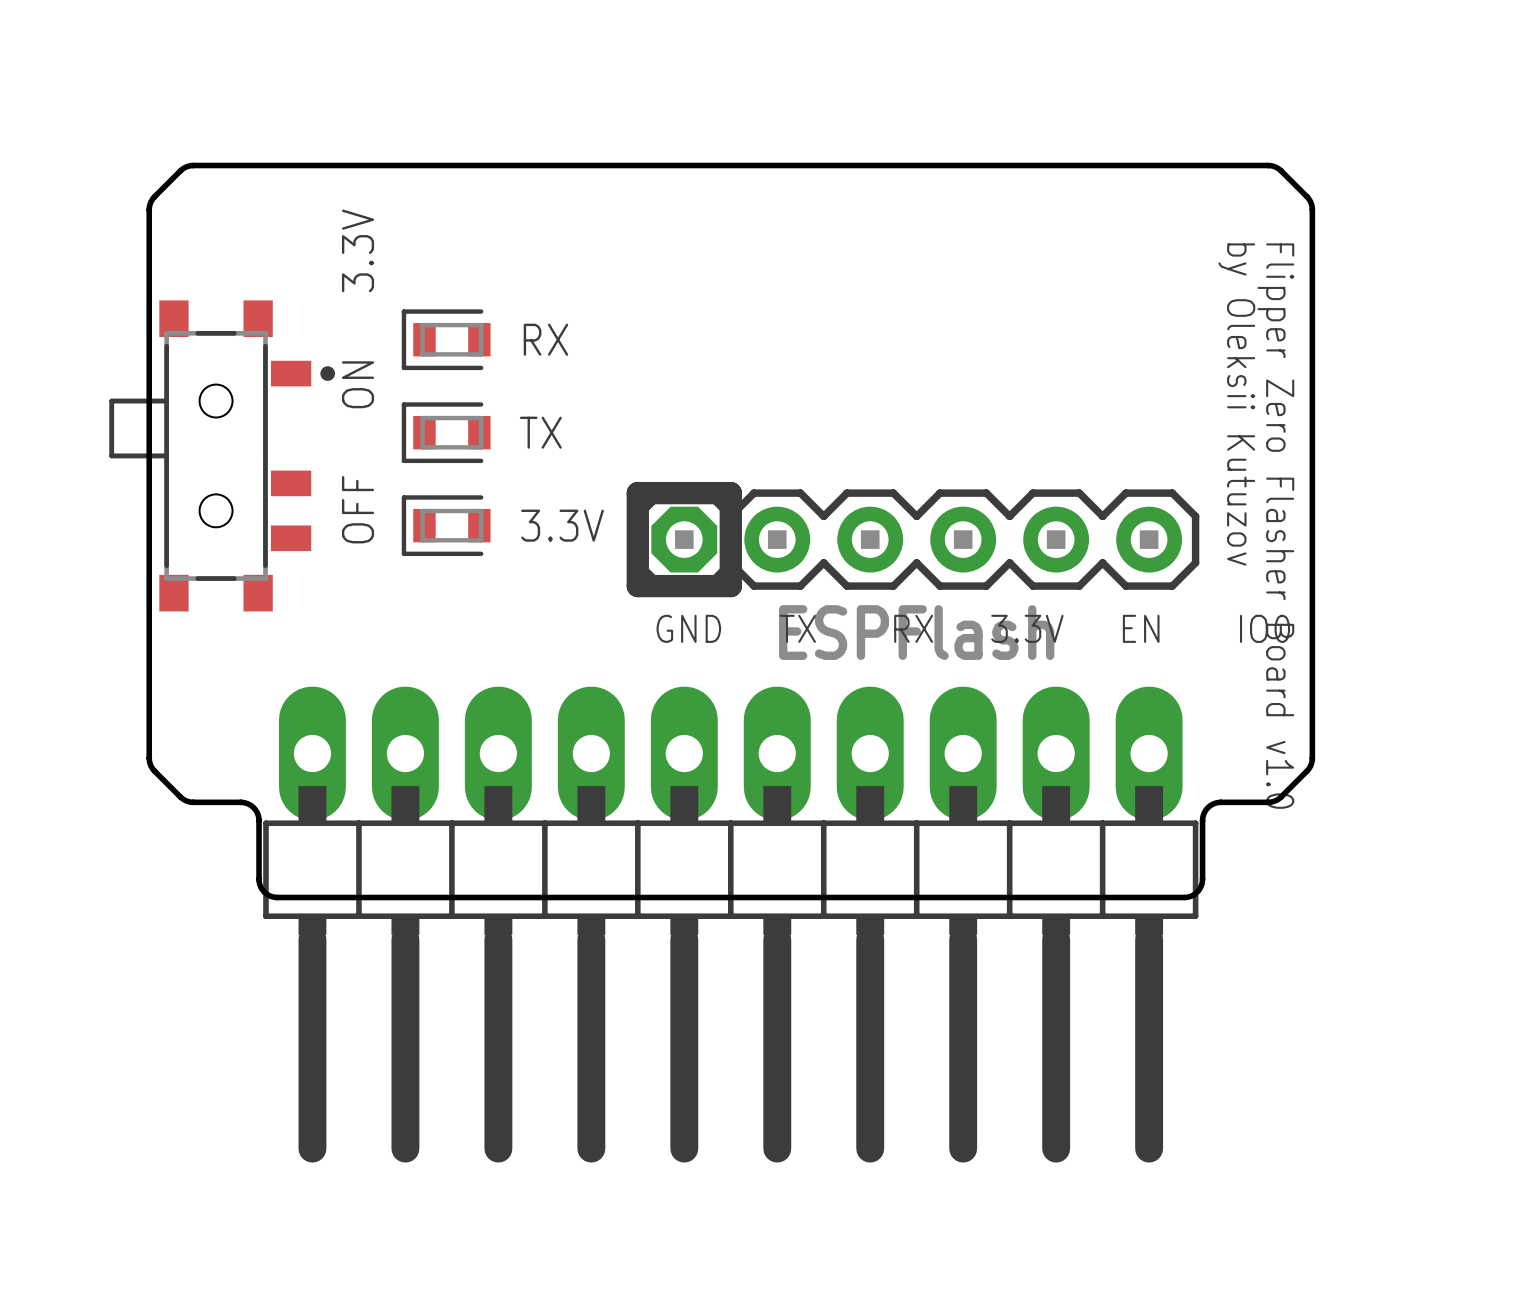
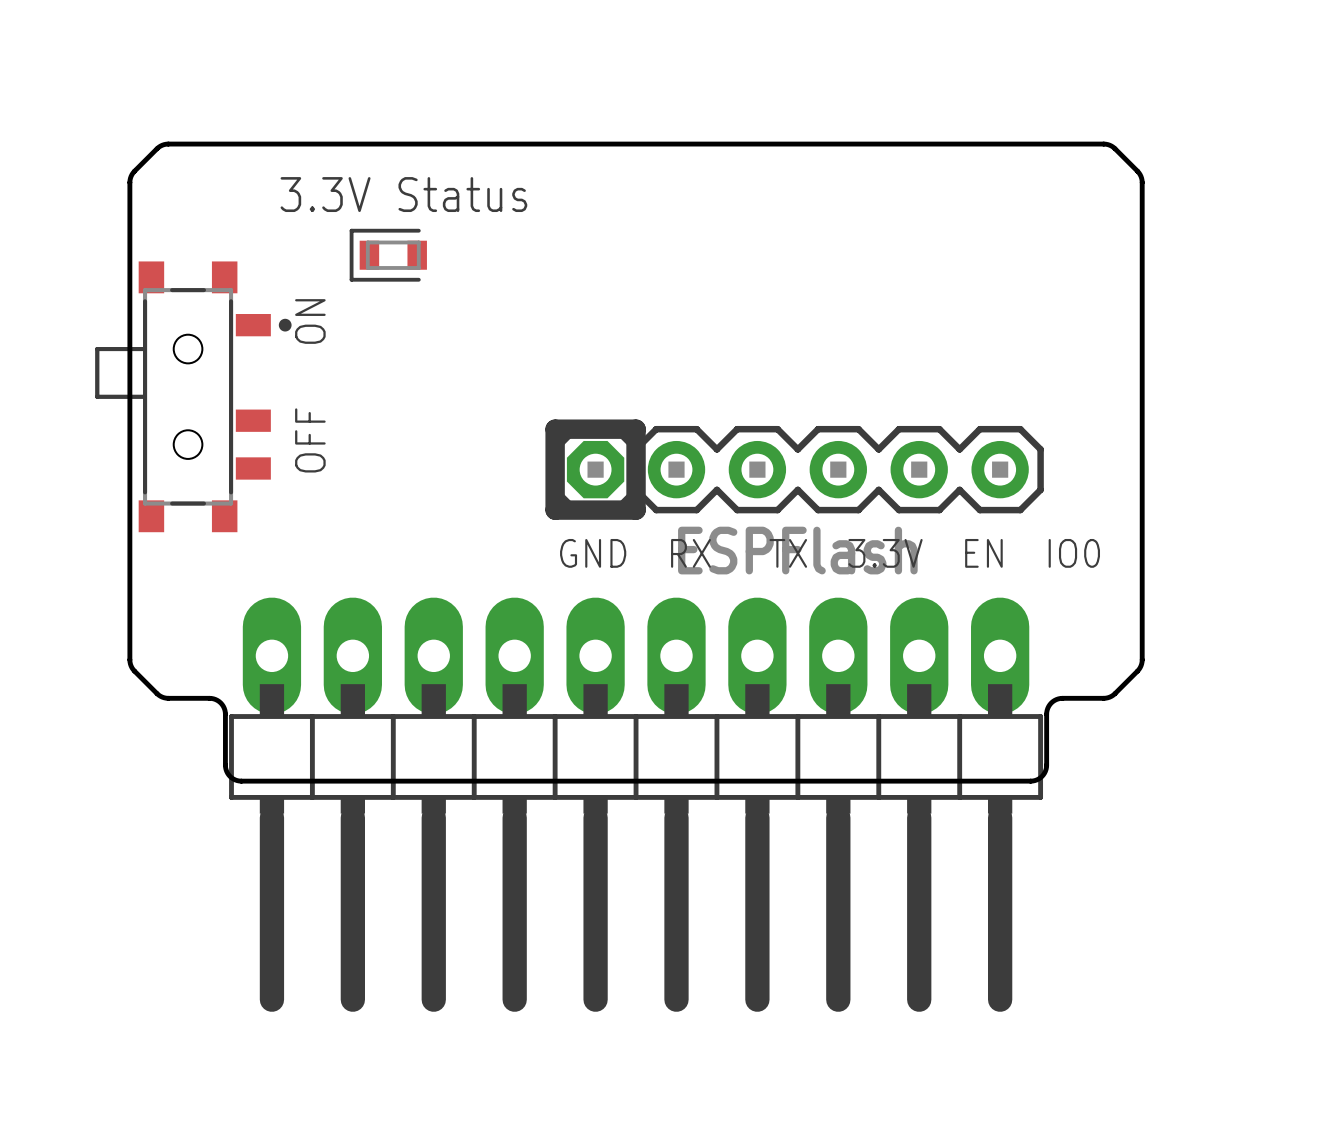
text: none -> 3.3V Status (403, 194)
part position: (446, 339) -> (388, 255)
text: RX (545, 339) -> none
text: OFF ON 3.3V (358, 376) -> OFF ON (310, 385)
text: by Oleksii Kutuzov (1236, 404) -> none
part: (446, 432) -> none
text: TX (540, 432) -> none
part: (446, 525) -> none
text: 3.3V (562, 525) -> none
text: Flipper Zero Flasher Board v1.0 (1275, 526) -> none
text: GND TX RX 3.3V EN IO0 (973, 628) -> GND RX TX 3.3V EN IO0 (830, 553)

